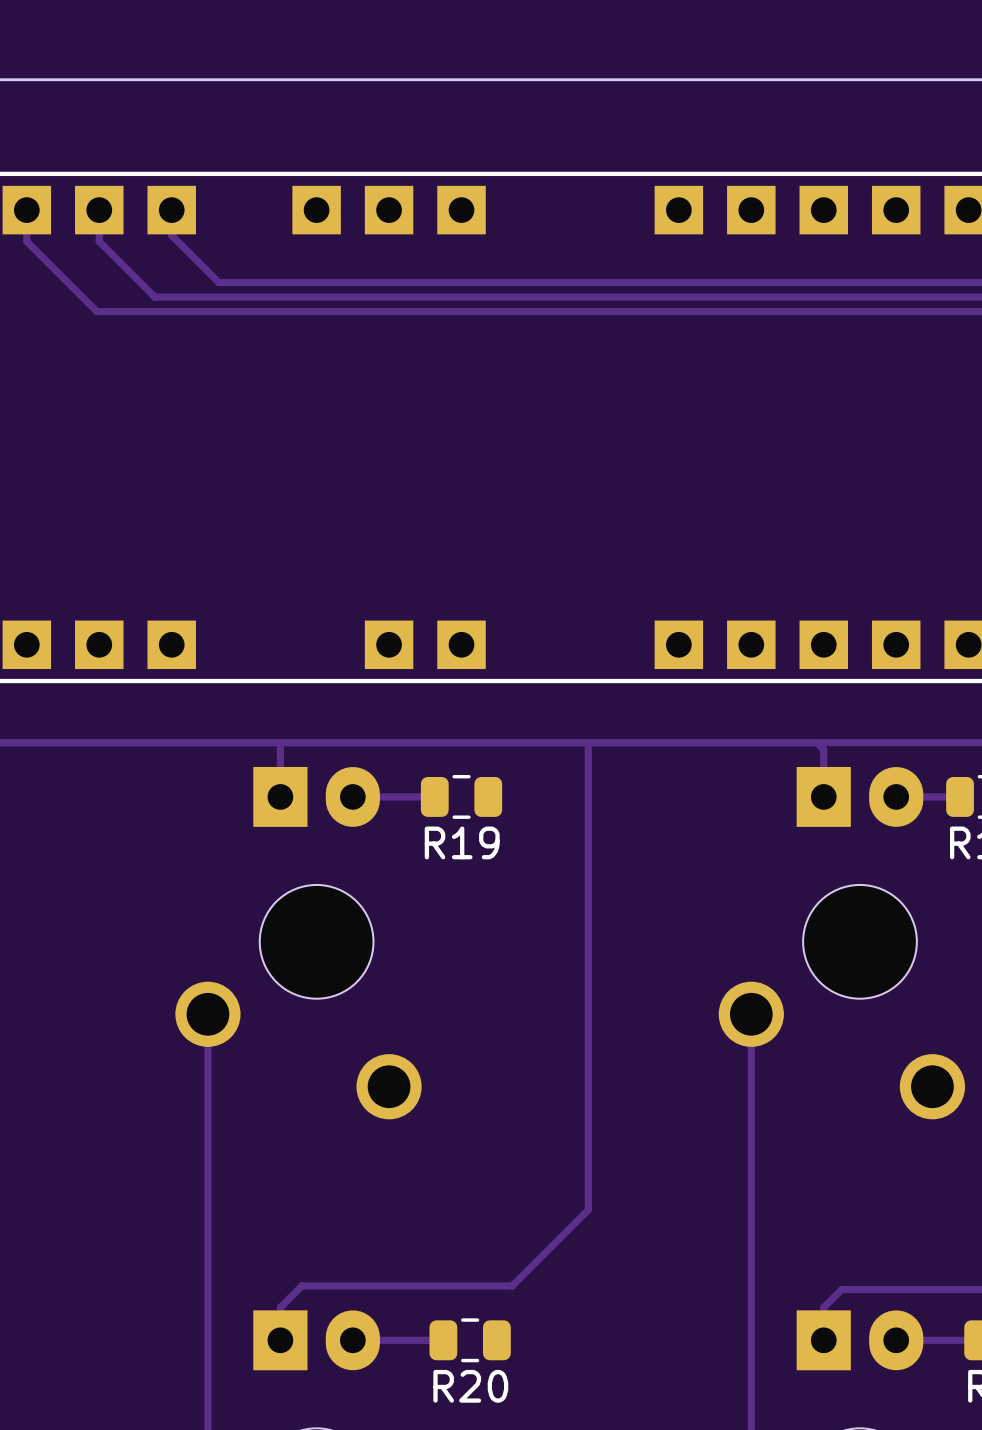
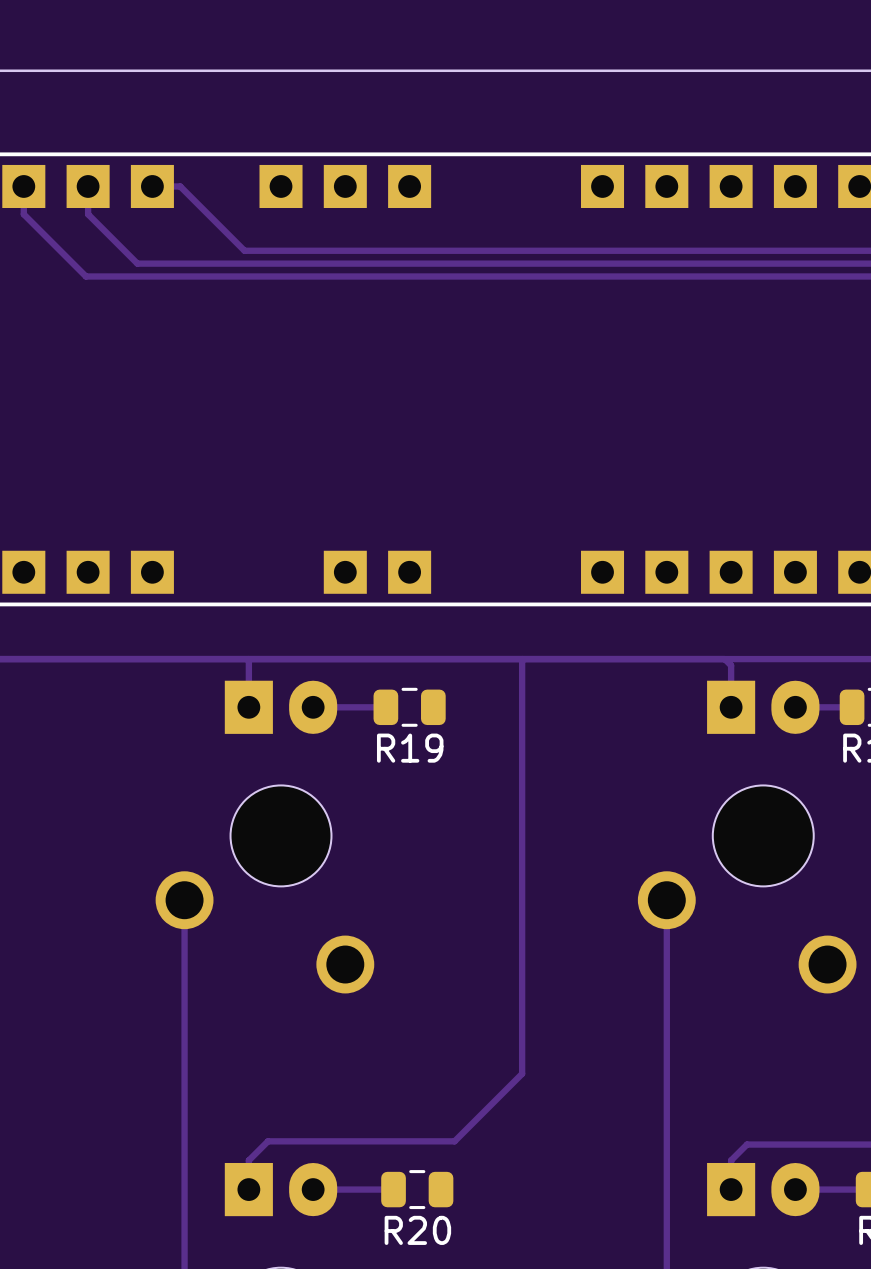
track: (171, 210) (171, 235) (218, 282) (275, 282) -> (152, 186) (180, 186) (244, 250)

